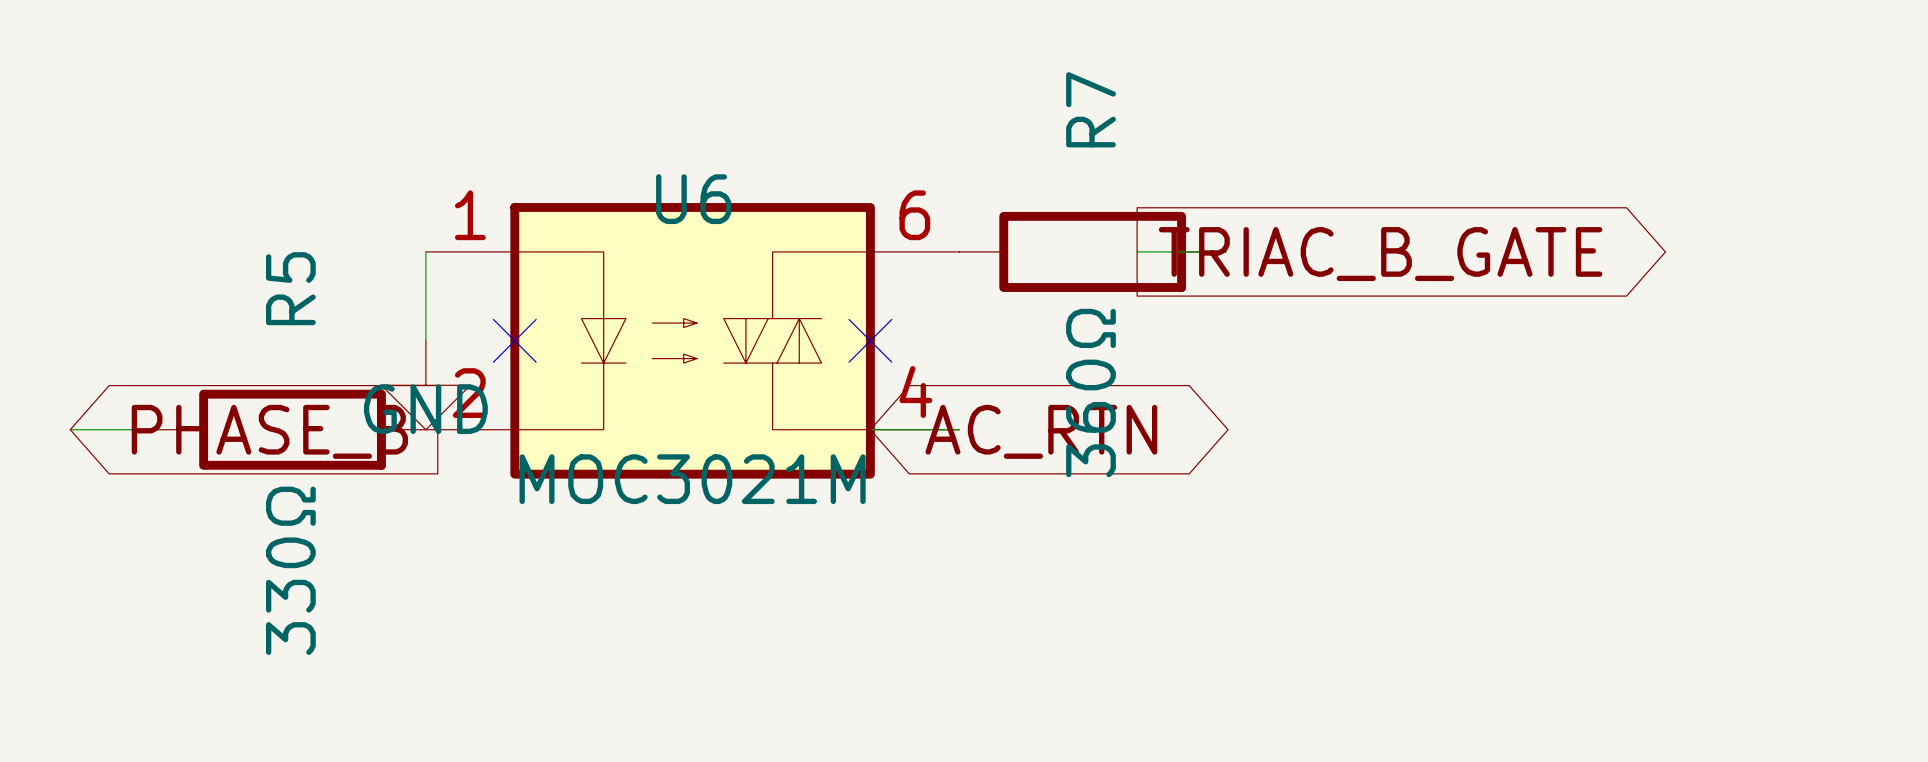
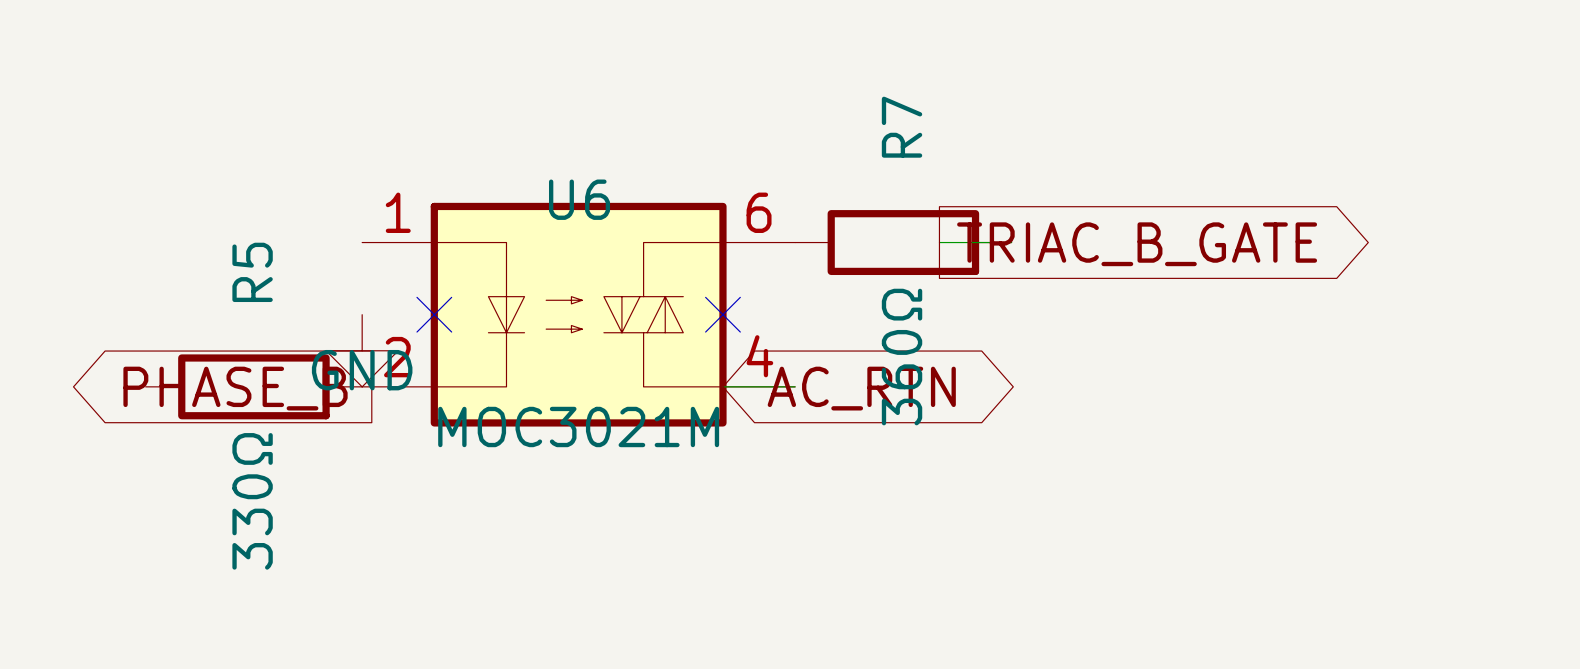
wire: (425, 251) (425, 340) -> none
wire: (70, 429) (159, 429) -> none

